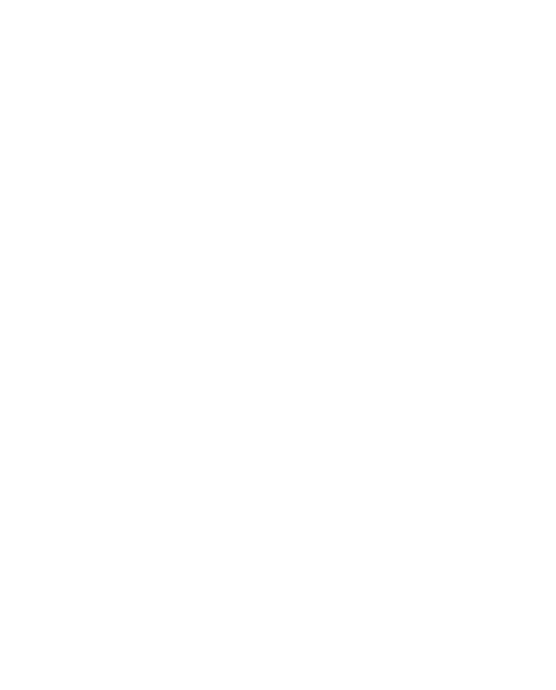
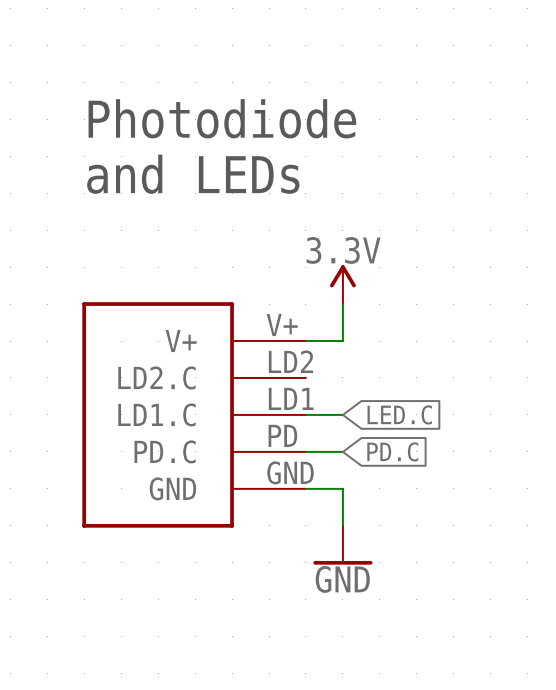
text: none -> Photodiode (222, 118)
text: none -> and LEDs (193, 174)
power symbol: none -> 3.3V (342, 284)
wire: none -> (342, 304) (342, 341) (305, 341)
part: none -> (194, 414)
wire: none -> (305, 414) (342, 414)
global label: none -> LED.C (399, 414)
wire: none -> (305, 451) (342, 451)
global label: none -> PD.C (392, 451)
wire: none -> (305, 488) (342, 488) (342, 525)
power symbol: none -> GND (342, 545)

